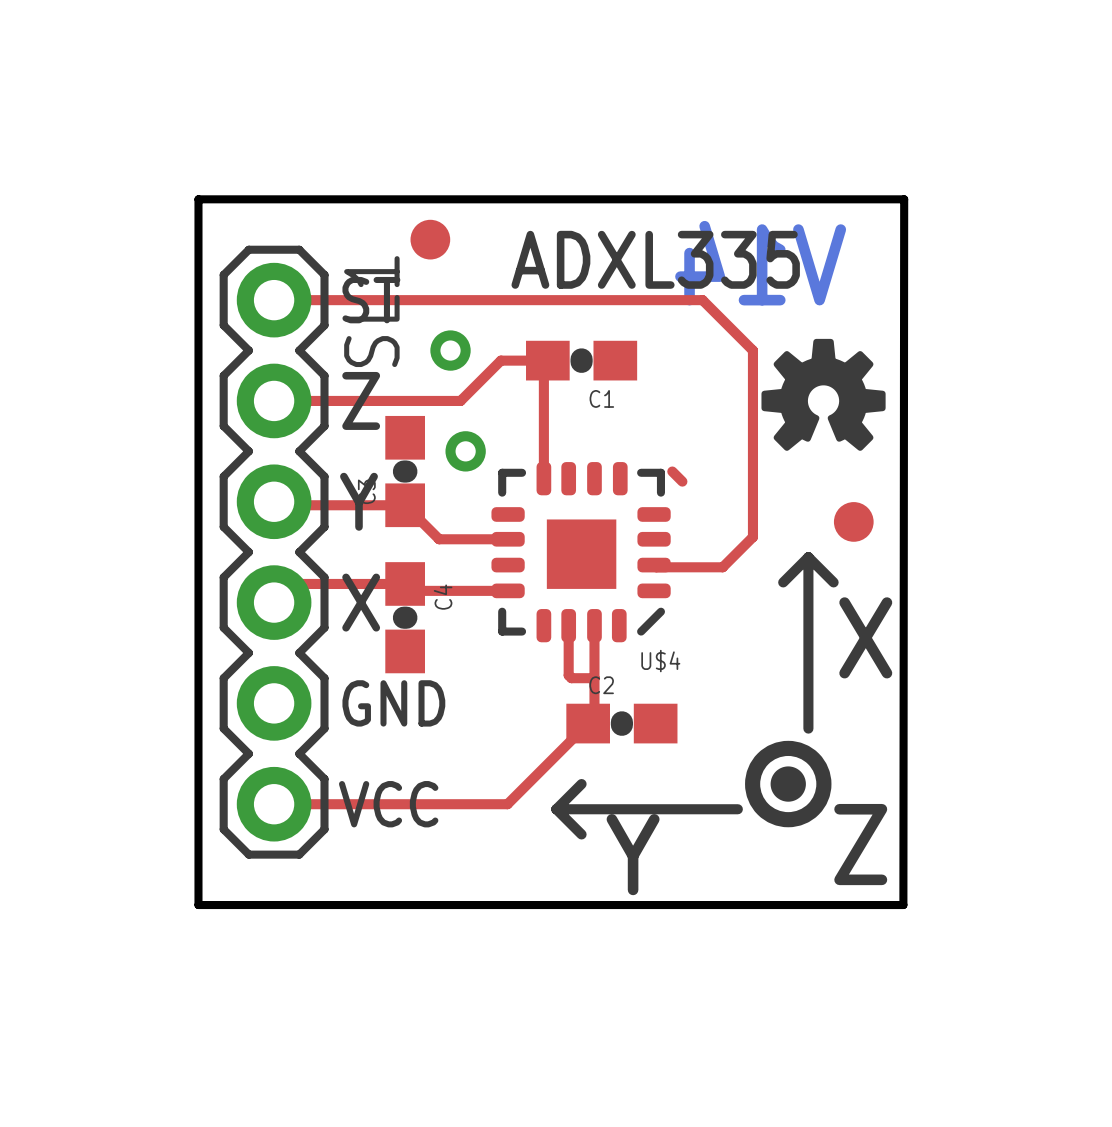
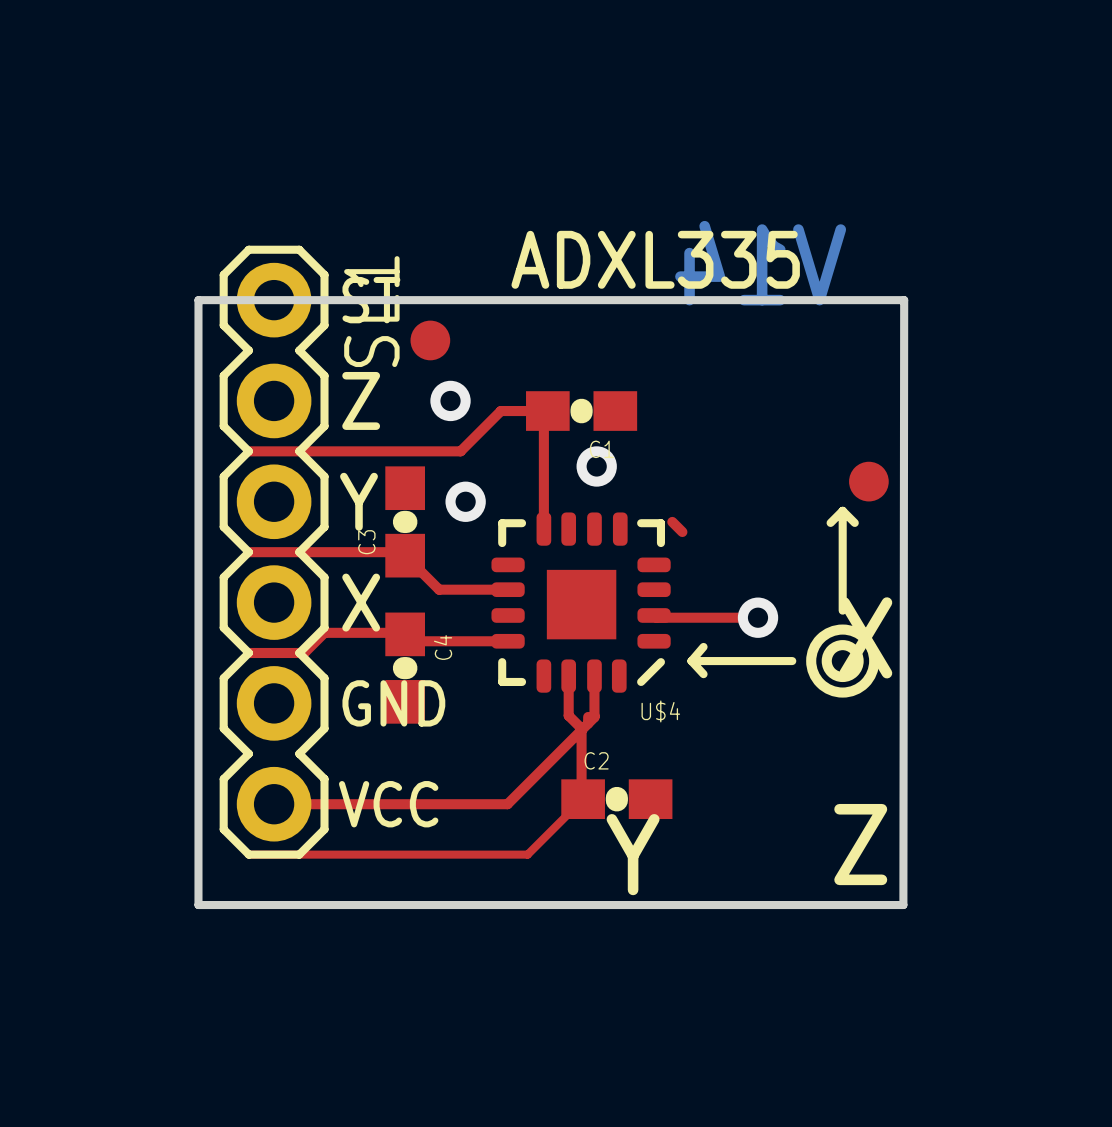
part position: (430, 239) -> (430, 340)
board edge: (198, 300) (198, 199) (904, 199) (903, 905) -> (198, 300) (904, 300) (903, 905)
top track: (274, 300) (702, 300) (752, 350) (752, 537) (722, 567) (656, 567) (654, 565) -> none
drawing: [761, 338, 886, 451] -> none
via: (450, 350) -> none
C1 position: (581, 360) -> (581, 411)
top track: (274, 400) (460, 400) (500, 360) (547, 360) (543, 364) (543, 414) -> (248, 451) (460, 451) (500, 411) (547, 411) (543, 414)
via: none -> (450, 400)
via: (465, 451) -> none
via: none -> (596, 466)
C3 position: (405, 471) -> (405, 521)
top track: (672, 471) (682, 481) -> (672, 521) (682, 532)
top track: (274, 501) (277, 505) (405, 505) (439, 539) (508, 539) -> none
via: none -> (465, 501)
line: none -> (842, 510) (842, 610)
line: none -> (842, 510) (854, 522)
line: none -> (842, 510) (830, 522)
part position: (853, 521) -> (868, 481)
U$4 position: (581, 552) -> (581, 602)
line: (808, 557) (808, 728) -> none
line: (808, 557) (833, 582) -> none
line: (808, 557) (783, 582) -> none
top track: (508, 590) (412, 590) (405, 583) (292, 583) (274, 602) -> (508, 589) (439, 589) (401, 552) (248, 552)
top track: none -> (654, 615) (656, 617) (758, 617)
C4 position: (405, 617) -> (405, 668)
via: none -> (758, 617)
drawing: none -> [806, 624, 880, 698]
top track: (568, 625) (568, 675) (571, 678) (594, 678) -> none
top track: (594, 625) (594, 676) -> (543, 478) (543, 529)
top track: none -> (508, 641) (412, 641) (403, 632) (324, 632) (304, 652) (248, 652)
line: none -> (703, 646) (691, 661)
line: none -> (691, 661) (792, 661)
line: none -> (691, 661) (703, 674)
top track: none -> (568, 676) (568, 715) (581, 728) (581, 802)
C2 position: (621, 723) -> (616, 799)
drawing: [745, 740, 832, 828] -> none
line: (581, 784) (556, 809) -> none
top track: none -> (583, 799) (527, 854) (248, 854)
line: (556, 809) (737, 809) -> none
line: (556, 809) (581, 834) -> none

